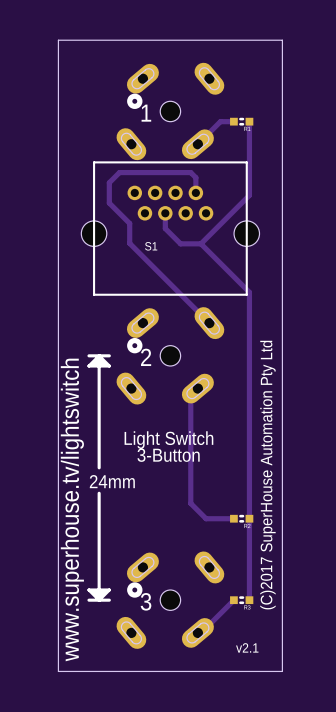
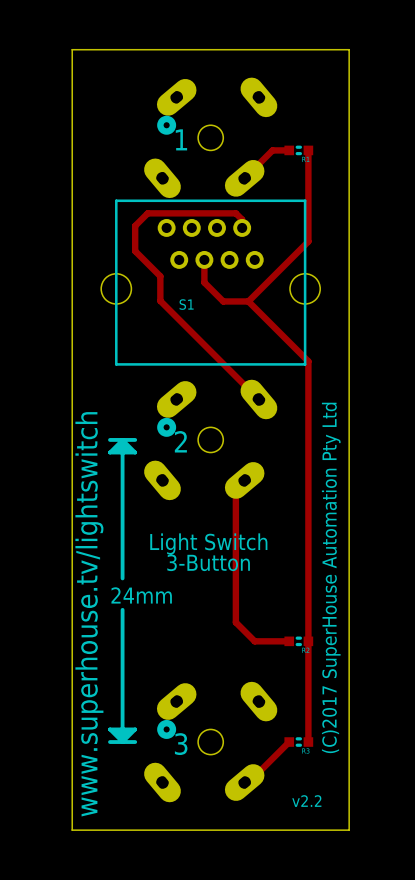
S1 footprint: [81, 161, 260, 296] -> [101, 199, 321, 366]
text: v2.1 (247, 647) -> v2.2 (306, 801)

